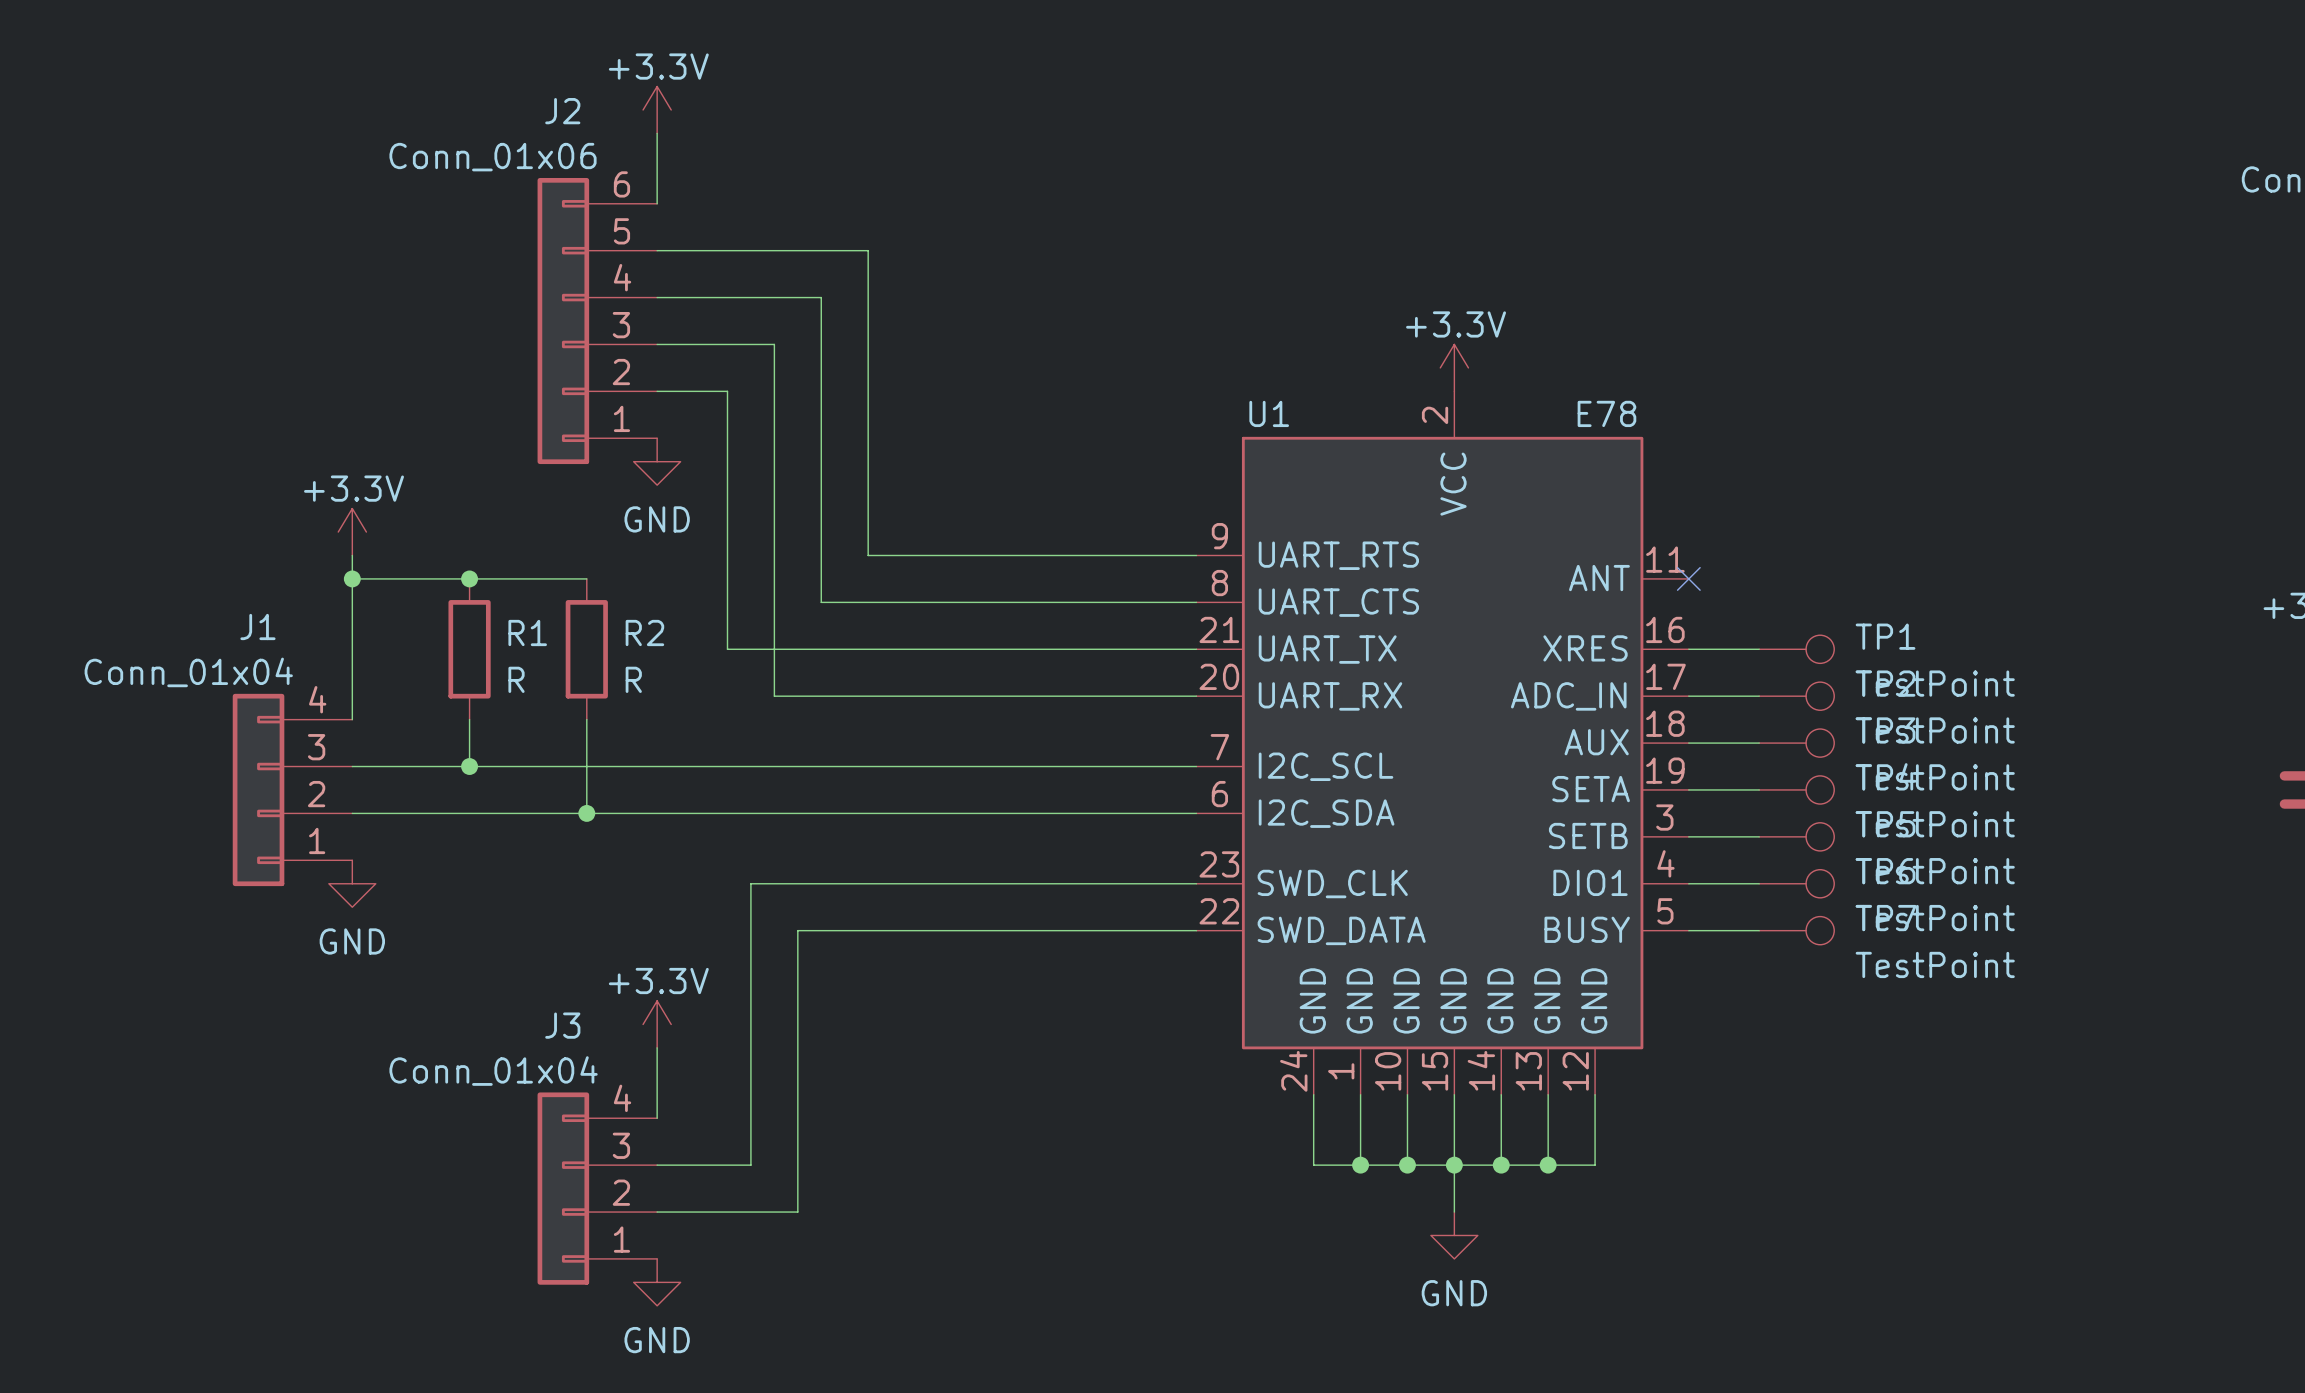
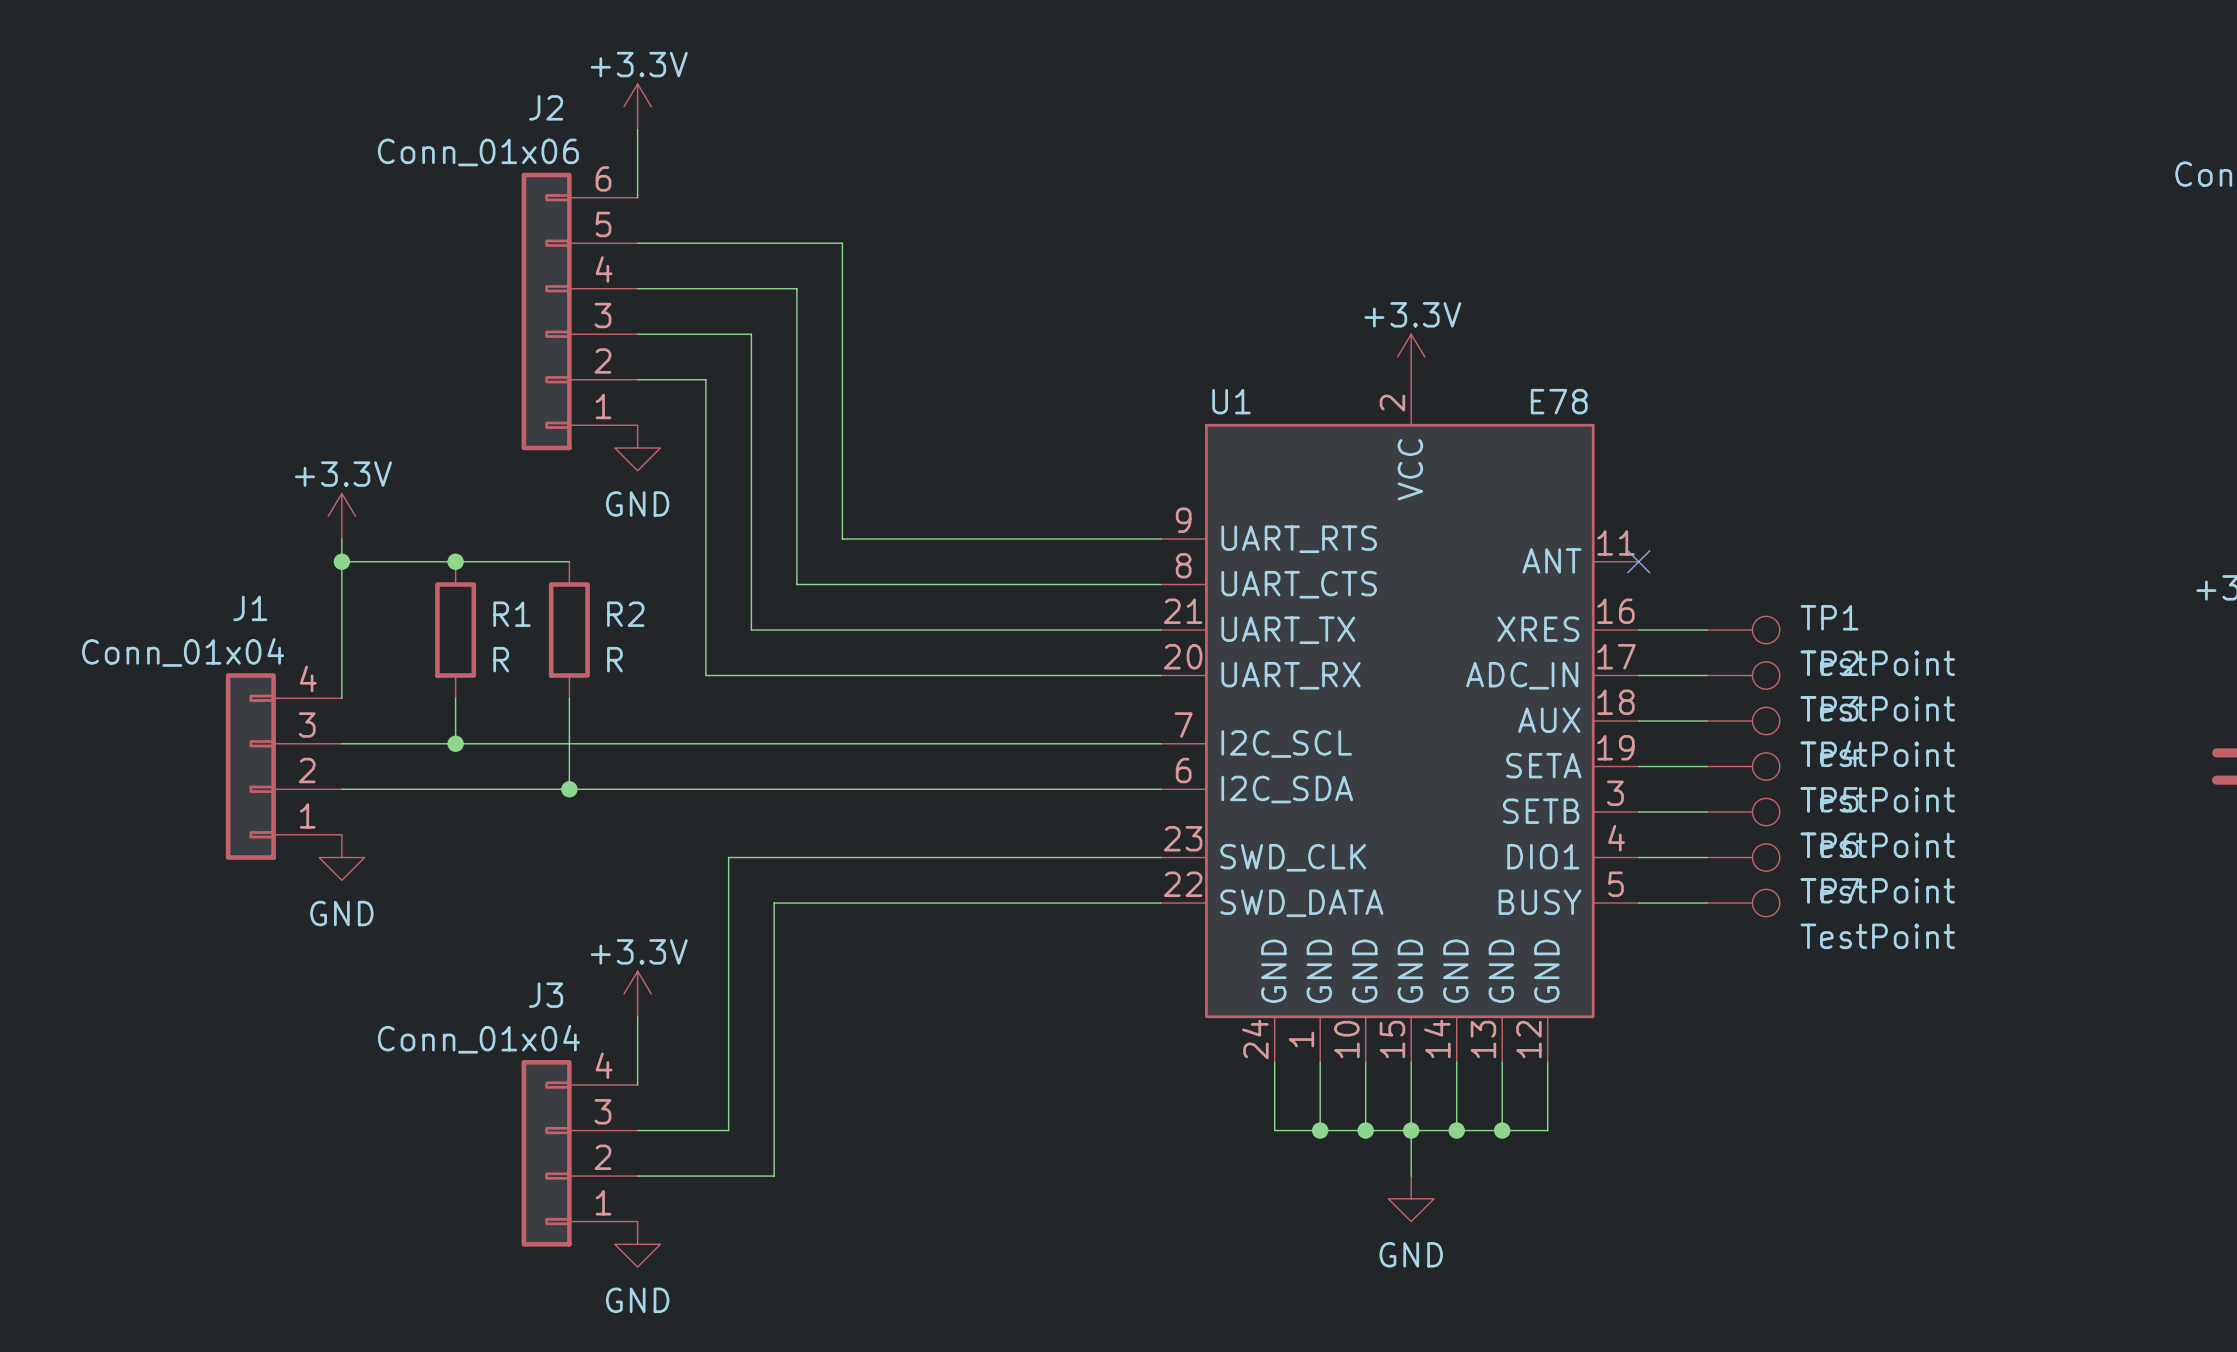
wire: (727, 649) (774, 649) (774, 696) -> (705, 630) (705, 675) (751, 675)

